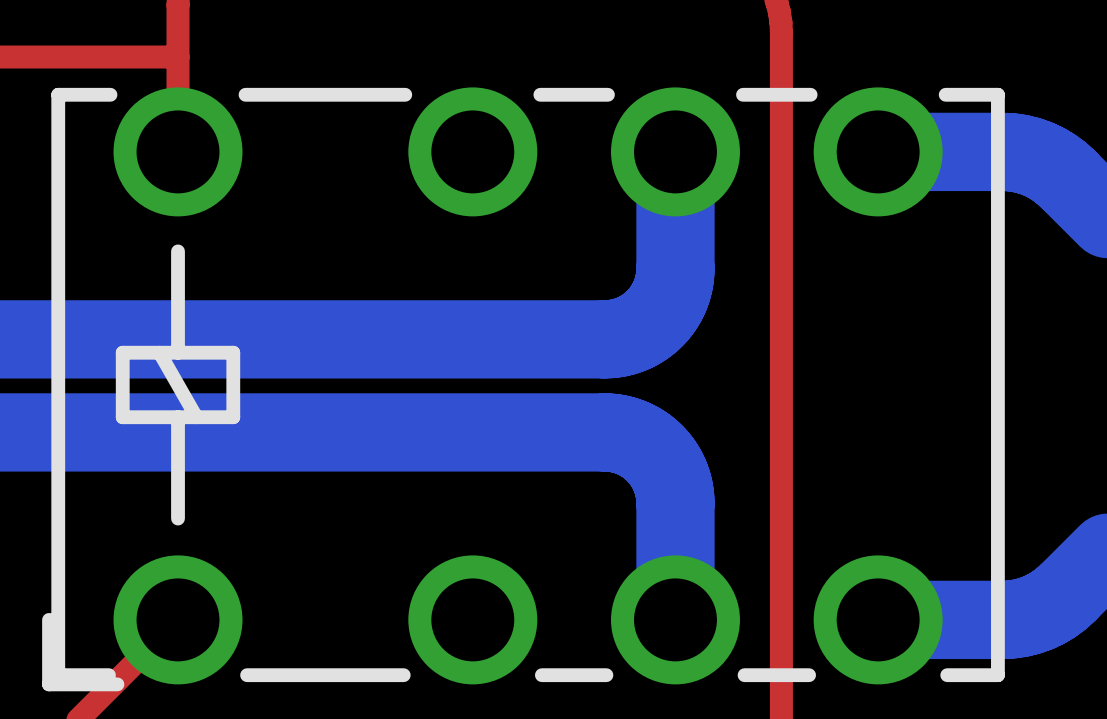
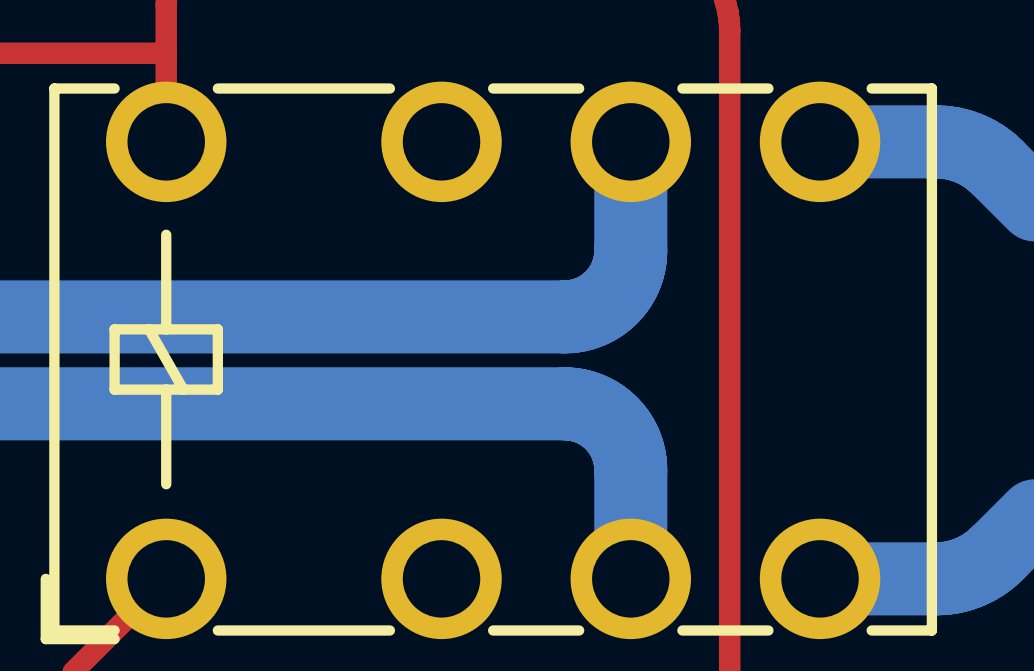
part footprint: [42, 87, 1005, 692] -> [40, 81, 938, 645]

